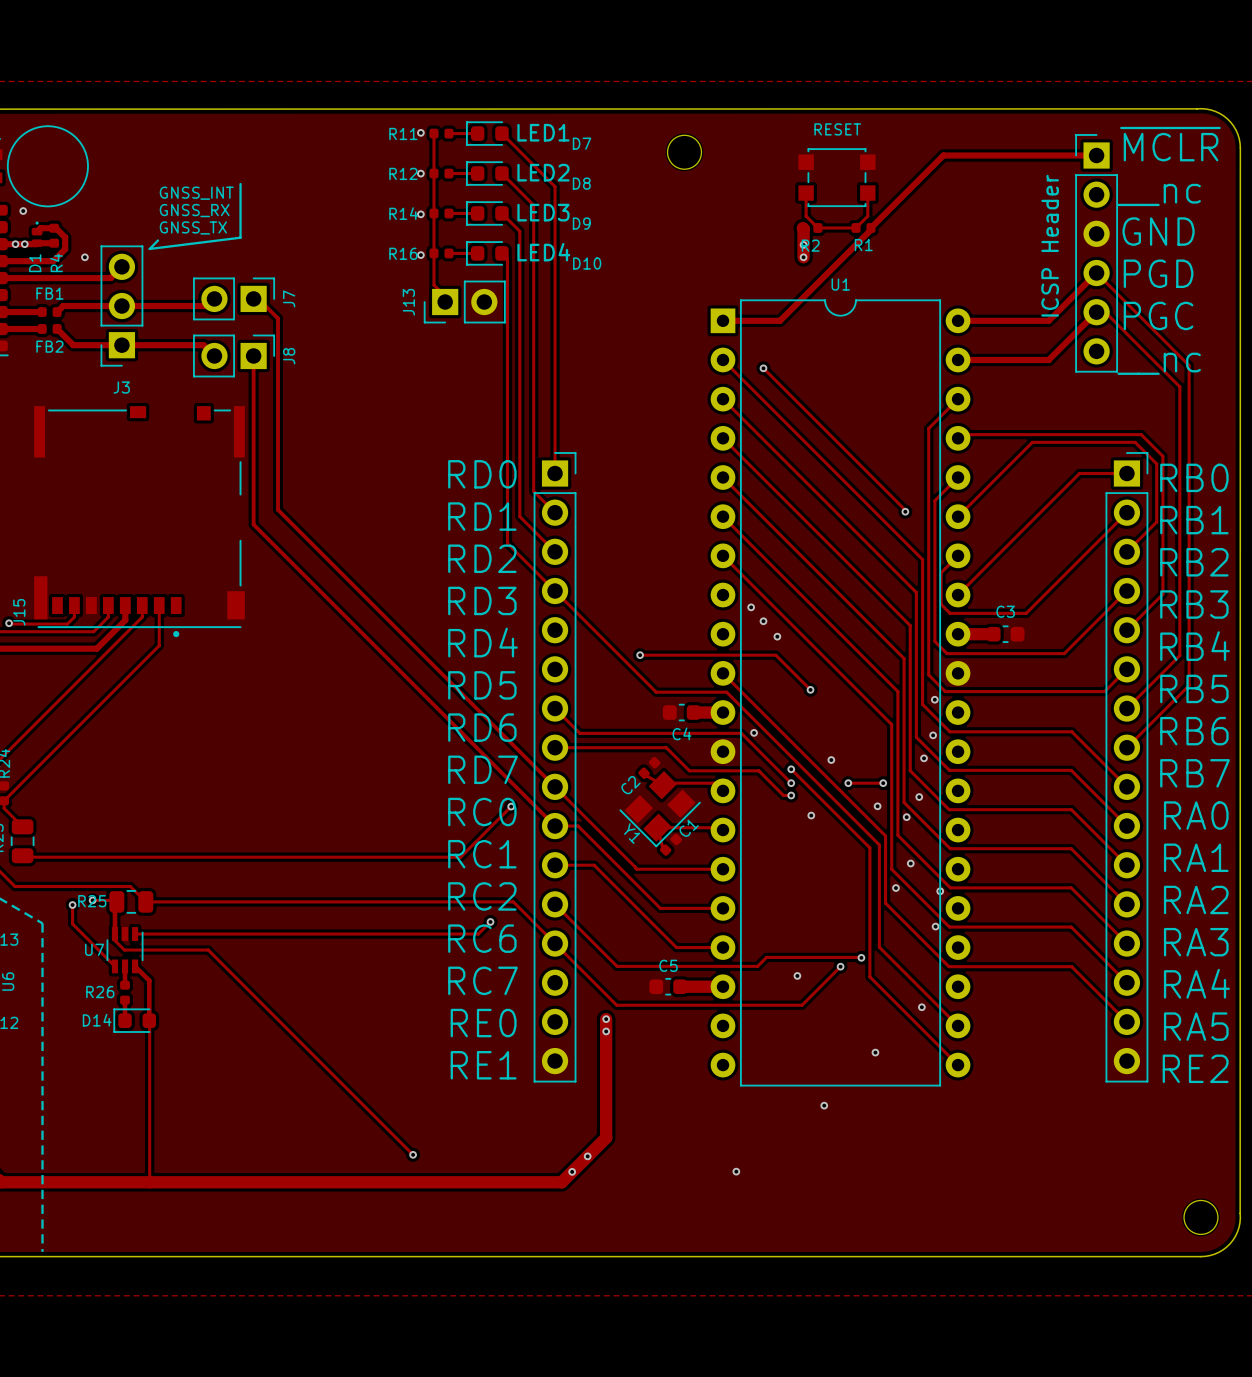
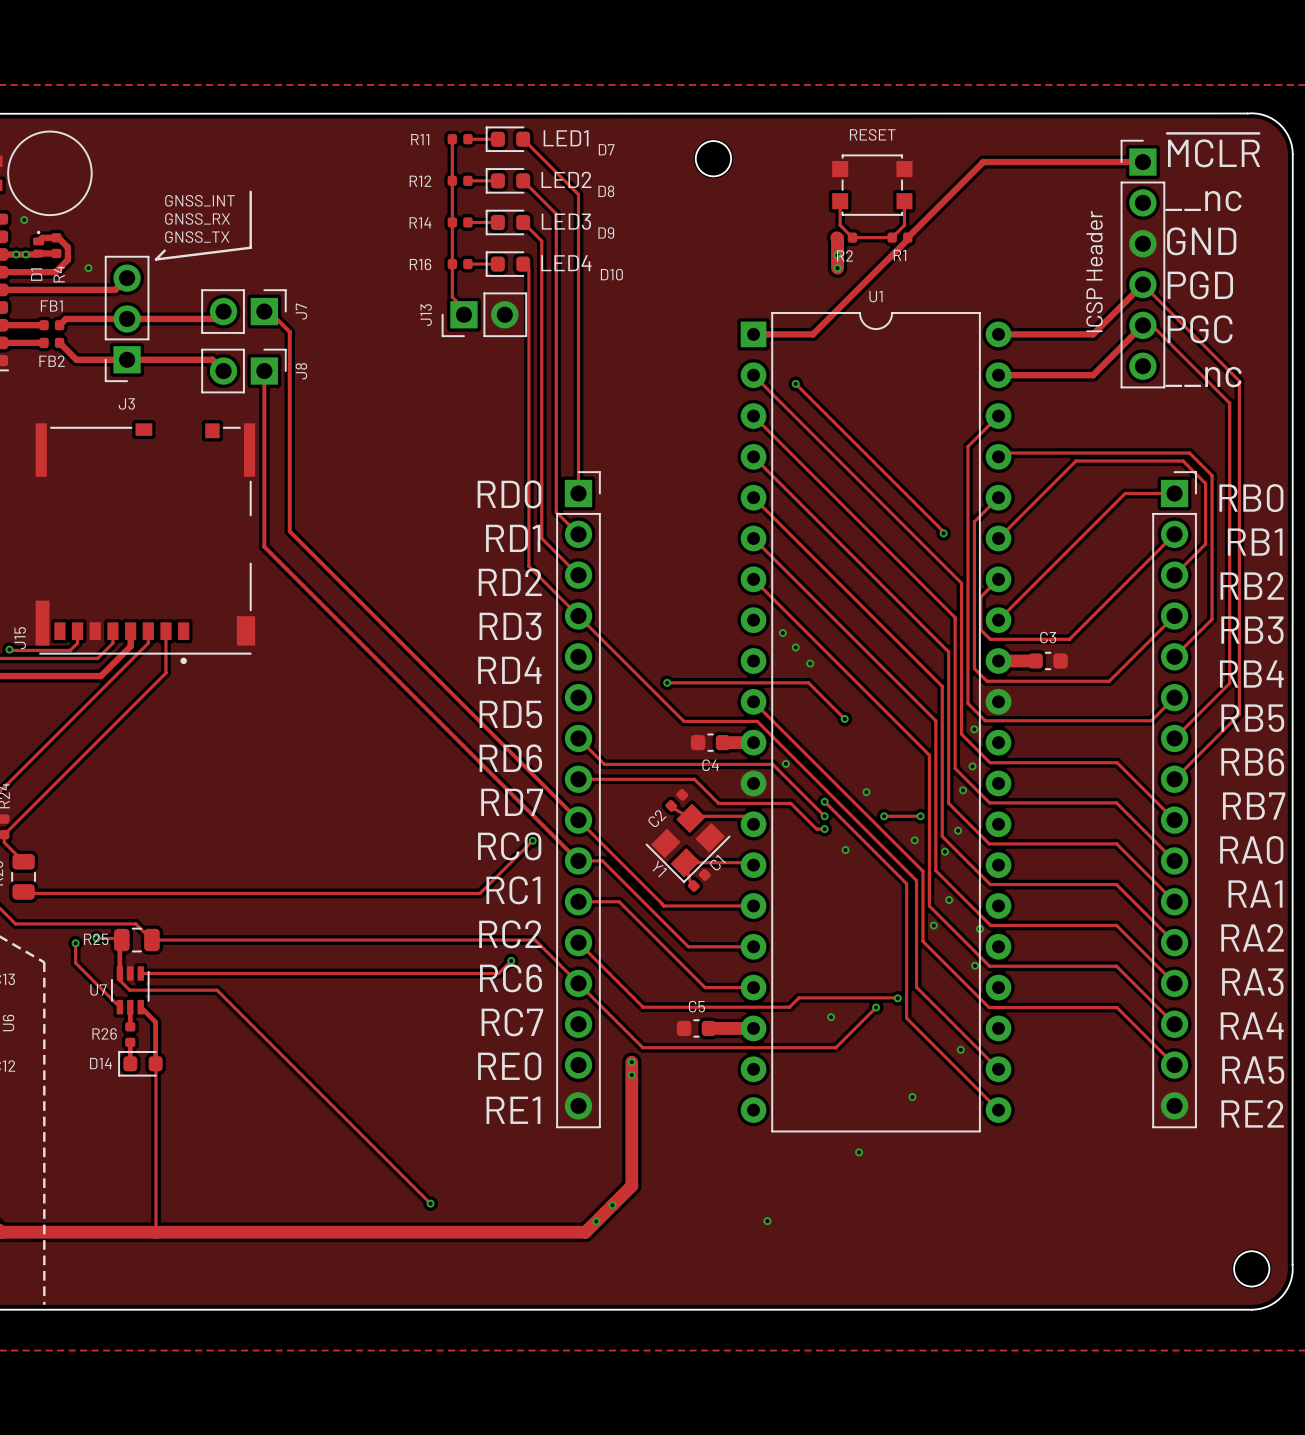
via: (420, 132) -> none
via: (420, 173) -> none
via: (420, 214) -> none
via: (420, 255) -> none

